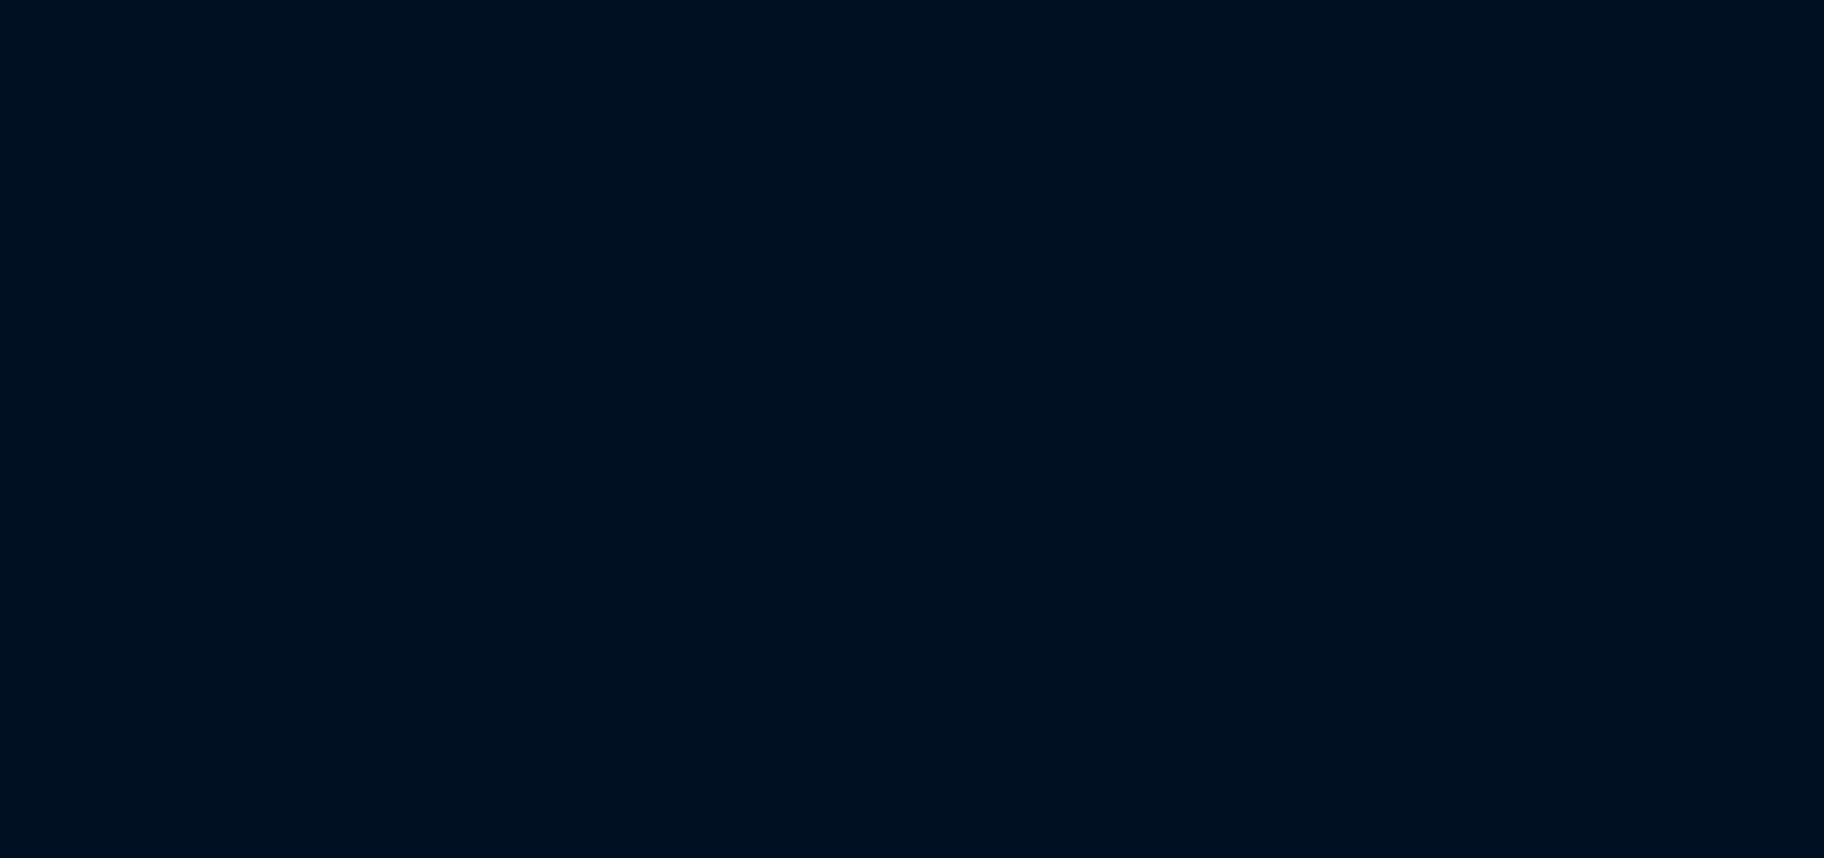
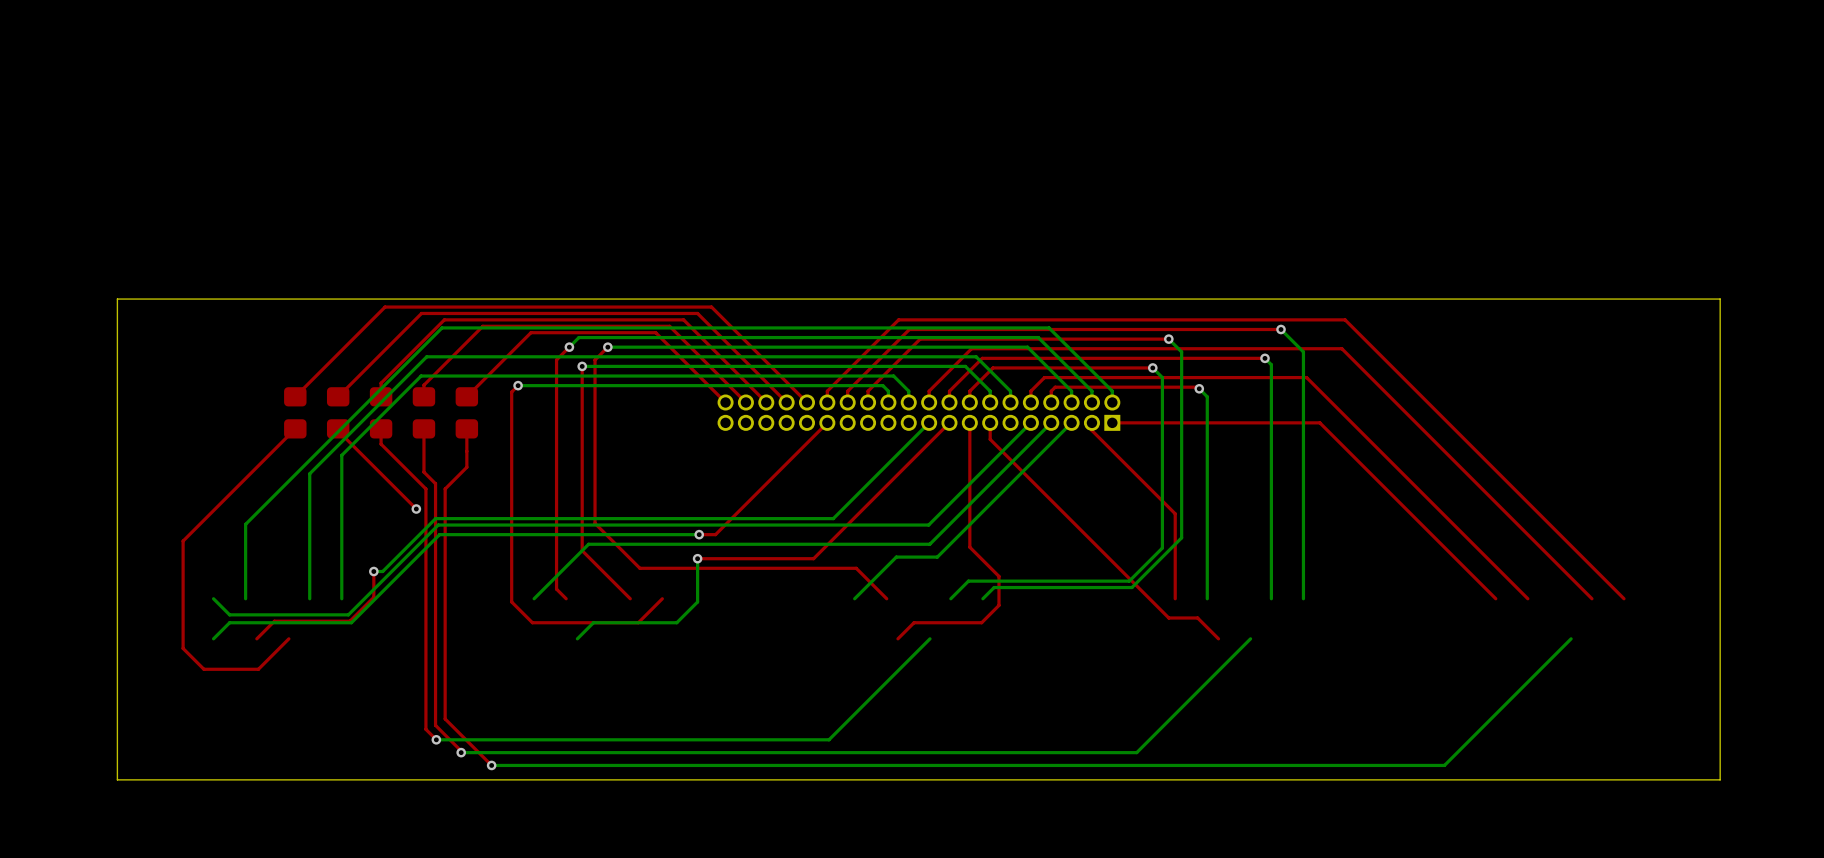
board edge: none -> (1720, 299) (1720, 779) (117, 779) (117, 299) (1720, 299)
top track: none -> (1281, 329) (909, 329) (847, 391) (847, 402)
bottom track: none -> (1281, 329) (1303, 351) (1303, 598)
via: none -> (1281, 329)
top track: none -> (1168, 339) (920, 339) (868, 391) (868, 402)
bottom track: none -> (1168, 339) (1181, 351) (1181, 537) (1131, 587) (994, 587) (982, 598)
via: none -> (1168, 339)
top track: none -> (569, 347) (556, 359) (556, 589) (566, 598)
bottom track: none -> (569, 347) (578, 337) (1038, 337) (1091, 391) (1091, 402)
via: none -> (569, 347)
top track: none -> (607, 347) (595, 360) (595, 523) (639, 568) (856, 568) (886, 598)
bottom track: none -> (607, 347) (1027, 347) (1071, 391) (1071, 402)
via: none -> (607, 347)
top track: none -> (1264, 358) (982, 358) (949, 391) (949, 402)
bottom track: none -> (1264, 358) (1271, 364) (1271, 598)
via: none -> (1264, 358)
top track: none -> (582, 366) (582, 550) (630, 598)
bottom track: none -> (582, 366) (965, 366) (990, 391) (990, 402)
via: none -> (582, 366)
top track: none -> (1152, 367) (993, 367) (969, 391) (969, 402)
bottom track: none -> (1152, 367) (1162, 377) (1162, 548) (1129, 581) (968, 581) (950, 598)
via: none -> (1152, 367)
top track: none -> (518, 385) (511, 392) (511, 601) (532, 622) (638, 622) (662, 598)
bottom track: none -> (518, 385) (882, 385) (888, 391) (888, 402)
via: none -> (518, 385)
top track: none -> (1199, 388) (1197, 387) (1055, 387) (1051, 391) (1051, 402)
bottom track: none -> (1199, 388) (1207, 396) (1207, 598)
via: none -> (1199, 388)
top track: none -> (295, 396) (385, 307) (711, 307) (806, 402)
top track: none -> (338, 396) (421, 313) (697, 313) (786, 402)
top track: none -> (381, 396) (381, 383) (444, 319) (683, 319) (766, 402)
top track: none -> (423, 396) (423, 385) (482, 326) (669, 326) (745, 402)
top track: none -> (466, 396) (530, 332) (655, 332) (725, 402)
top track: none -> (827, 402) (827, 391) (898, 319) (1345, 319) (1624, 598)
bottom track: none -> (908, 402) (908, 391) (893, 376) (421, 376) (341, 455) (341, 598)
top track: none -> (929, 402) (929, 391) (971, 348) (1341, 348) (1591, 598)
bottom track: none -> (1010, 402) (1010, 391) (976, 356) (426, 356) (309, 473) (309, 598)
top track: none -> (1030, 402) (1030, 391) (1044, 377) (1306, 377) (1527, 598)
bottom track: none -> (1112, 402) (1112, 391) (1049, 327) (442, 327) (245, 524) (245, 598)
part: none -> (295, 412)
part: none -> (338, 412)
part: none -> (381, 412)
part: none -> (423, 412)
part: none -> (466, 412)
part: none -> (918, 412)
top track: none -> (827, 422) (715, 534) (699, 534)
bottom track: none -> (929, 422) (833, 518) (435, 518) (382, 571) (373, 571)
top track: none -> (949, 422) (813, 558) (697, 558)
top track: none -> (969, 422) (969, 547) (998, 576) (998, 605) (981, 622) (914, 622) (897, 638)
top track: none -> (990, 422) (990, 439) (1168, 617) (1197, 617) (1218, 638)
bottom track: none -> (1030, 422) (928, 525) (438, 525) (348, 614) (229, 614) (213, 598)
bottom track: none -> (1051, 422) (929, 544) (588, 544) (534, 598)
bottom track: none -> (1071, 422) (937, 557) (896, 557) (854, 598)
top track: none -> (1091, 422) (1091, 430) (1175, 513) (1175, 598)
top track: none -> (1112, 422) (1319, 422) (1495, 598)
top track: none -> (295, 428) (183, 541) (183, 648) (203, 669) (258, 669) (288, 638)
top track: none -> (338, 428) (416, 509)
top track: none -> (381, 428) (381, 444) (425, 488) (425, 729) (436, 739)
top track: none -> (423, 428) (423, 472) (435, 483) (435, 725) (461, 752)
top track: none -> (466, 428) (466, 467) (445, 488) (445, 718) (491, 765)
via: none -> (416, 509)
bottom track: none -> (699, 534) (439, 534) (351, 622) (229, 622) (213, 638)
via: none -> (699, 534)
bottom track: none -> (697, 558) (697, 601) (676, 622) (593, 622) (577, 638)
via: none -> (697, 558)
top track: none -> (373, 571) (373, 597) (349, 621) (274, 621) (256, 638)
via: none -> (373, 571)
bottom track: none -> (930, 638) (829, 739) (436, 739)
bottom track: none -> (1250, 638) (1136, 752) (461, 752)
bottom track: none -> (1571, 638) (1444, 765) (491, 765)
via: none -> (436, 739)
via: none -> (461, 752)
via: none -> (491, 765)

